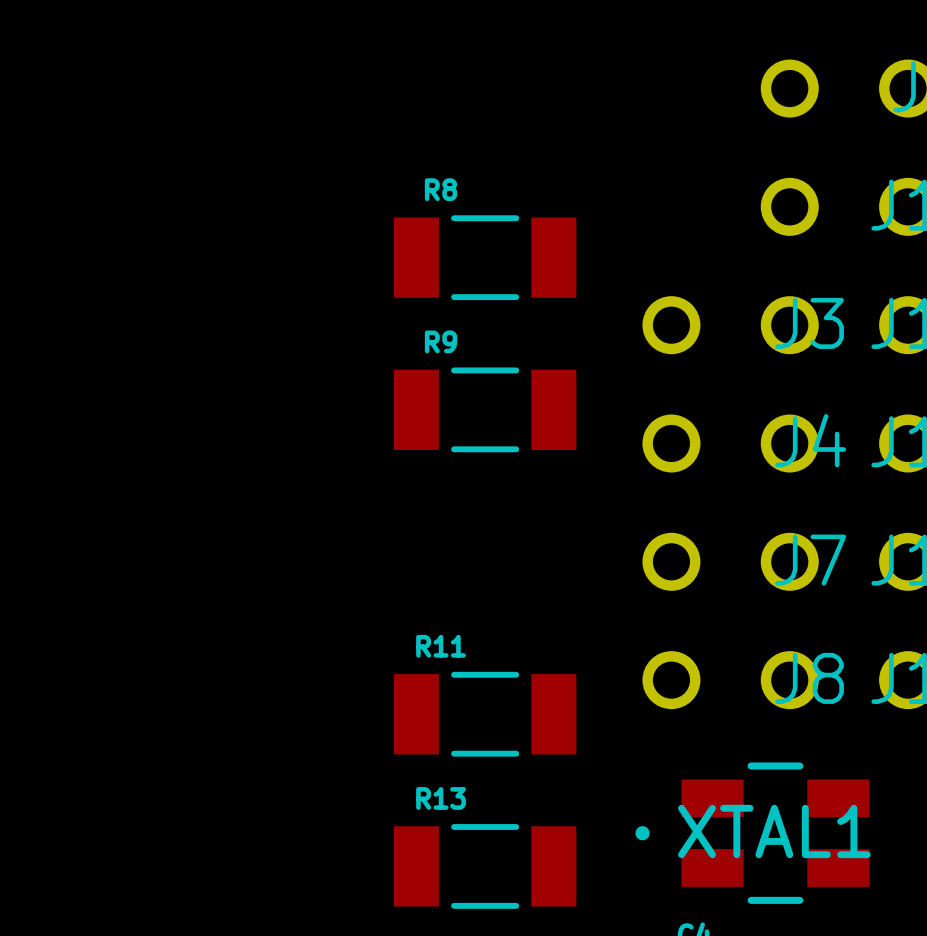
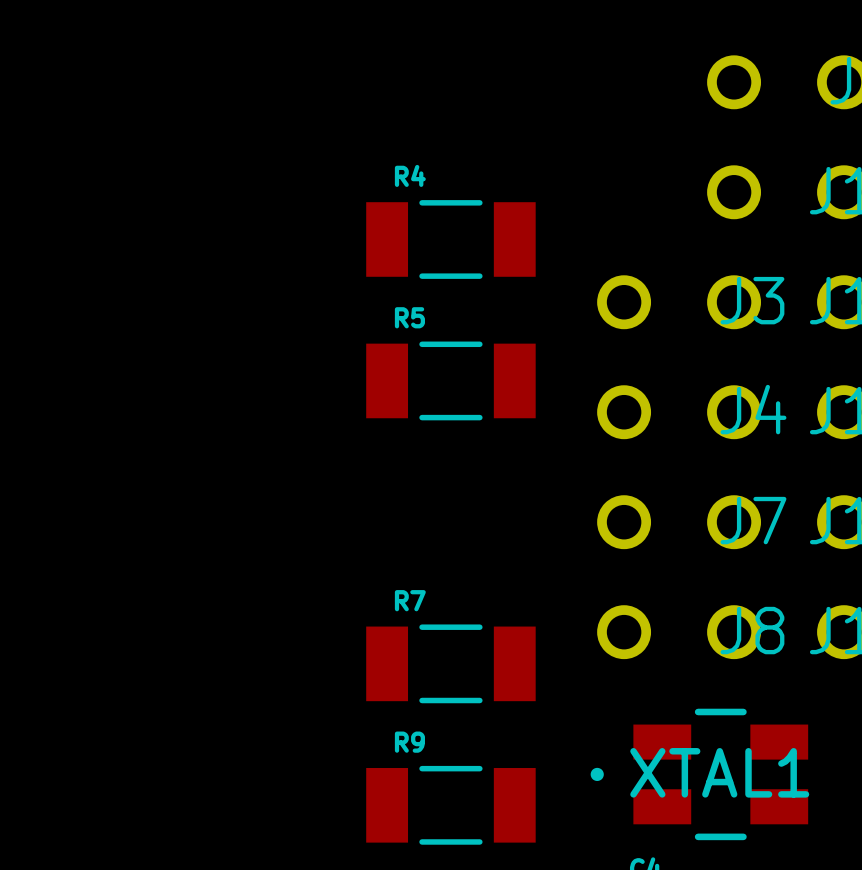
R8 name: R8 (441, 189) -> R4 (410, 175)
R9 name: R9 (441, 341) -> R5 (409, 317)
R11 name: R11 (441, 646) -> R7 (410, 600)
R13 name: R13 (441, 798) -> R9 (409, 742)

